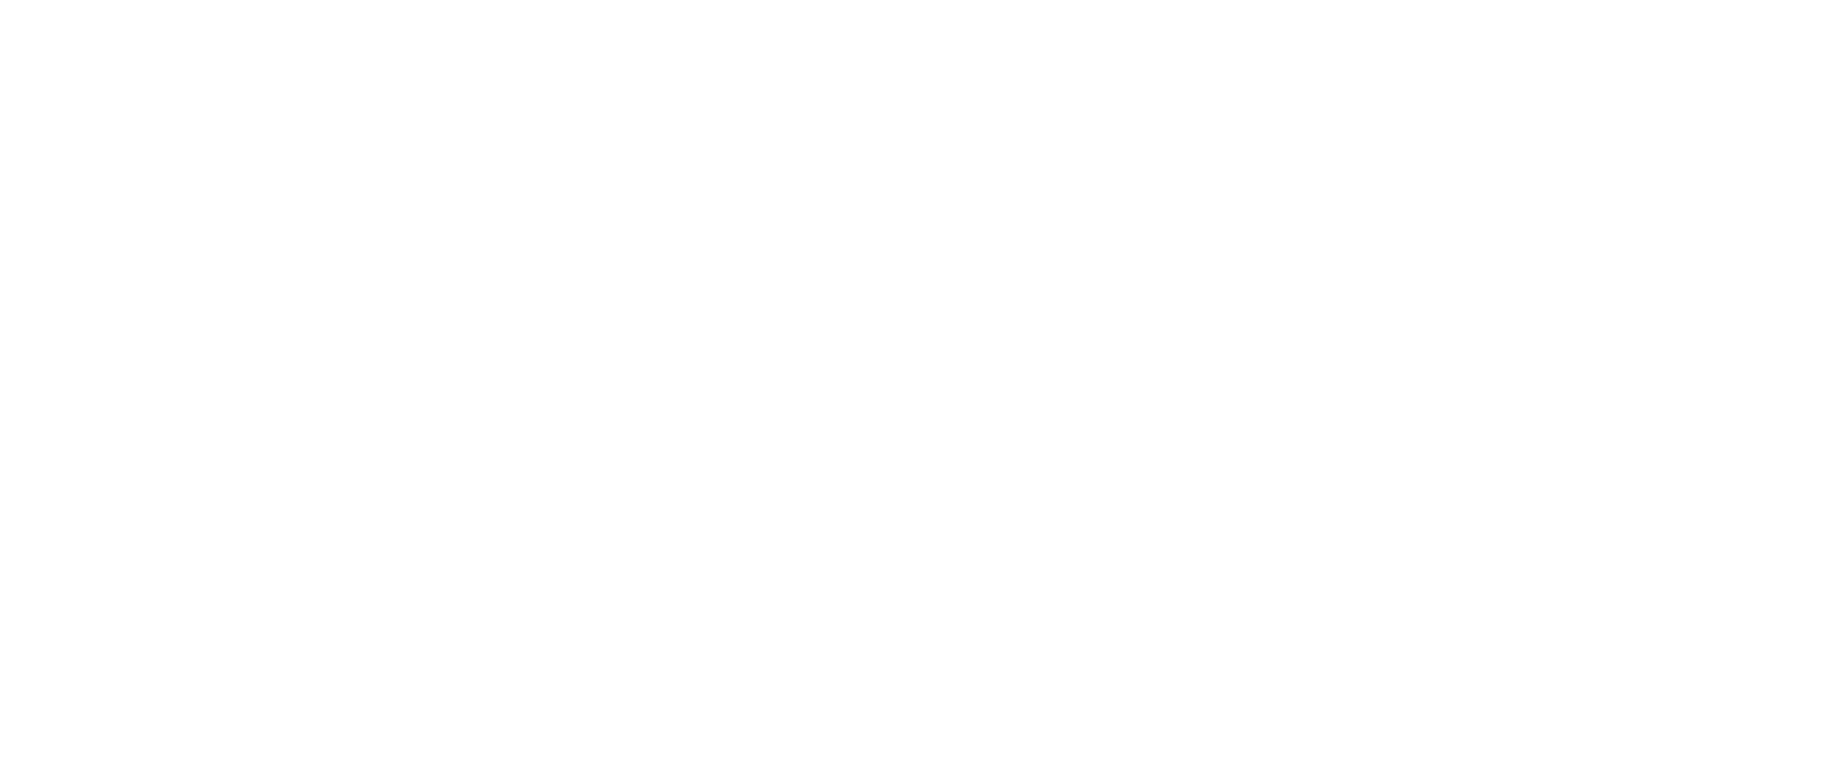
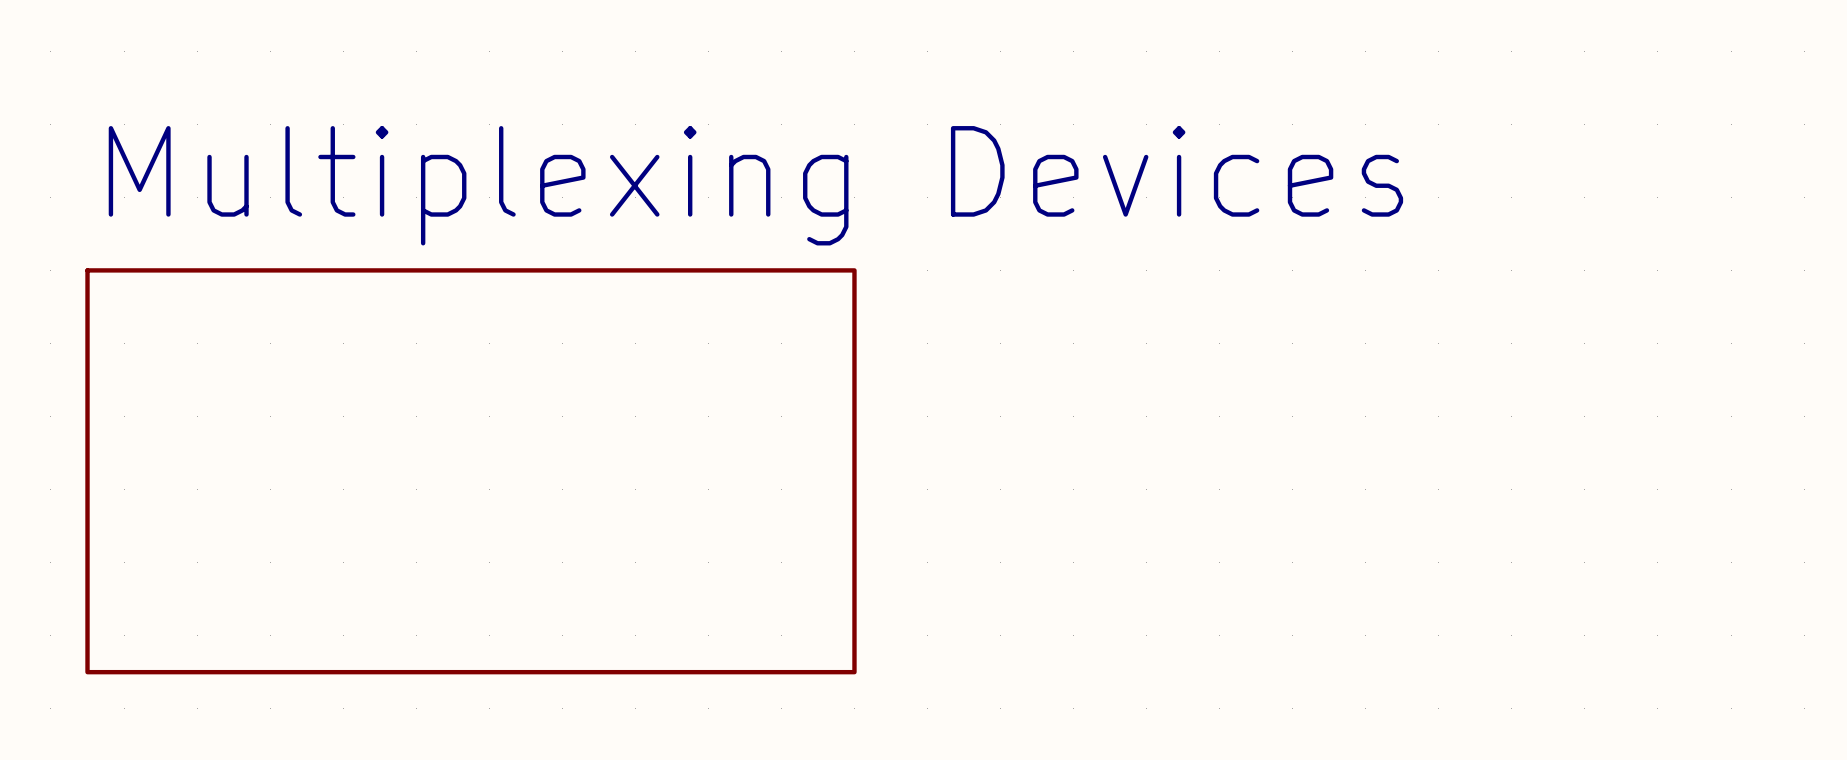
sheet Multiplexing Devices: none -> (470, 471)

